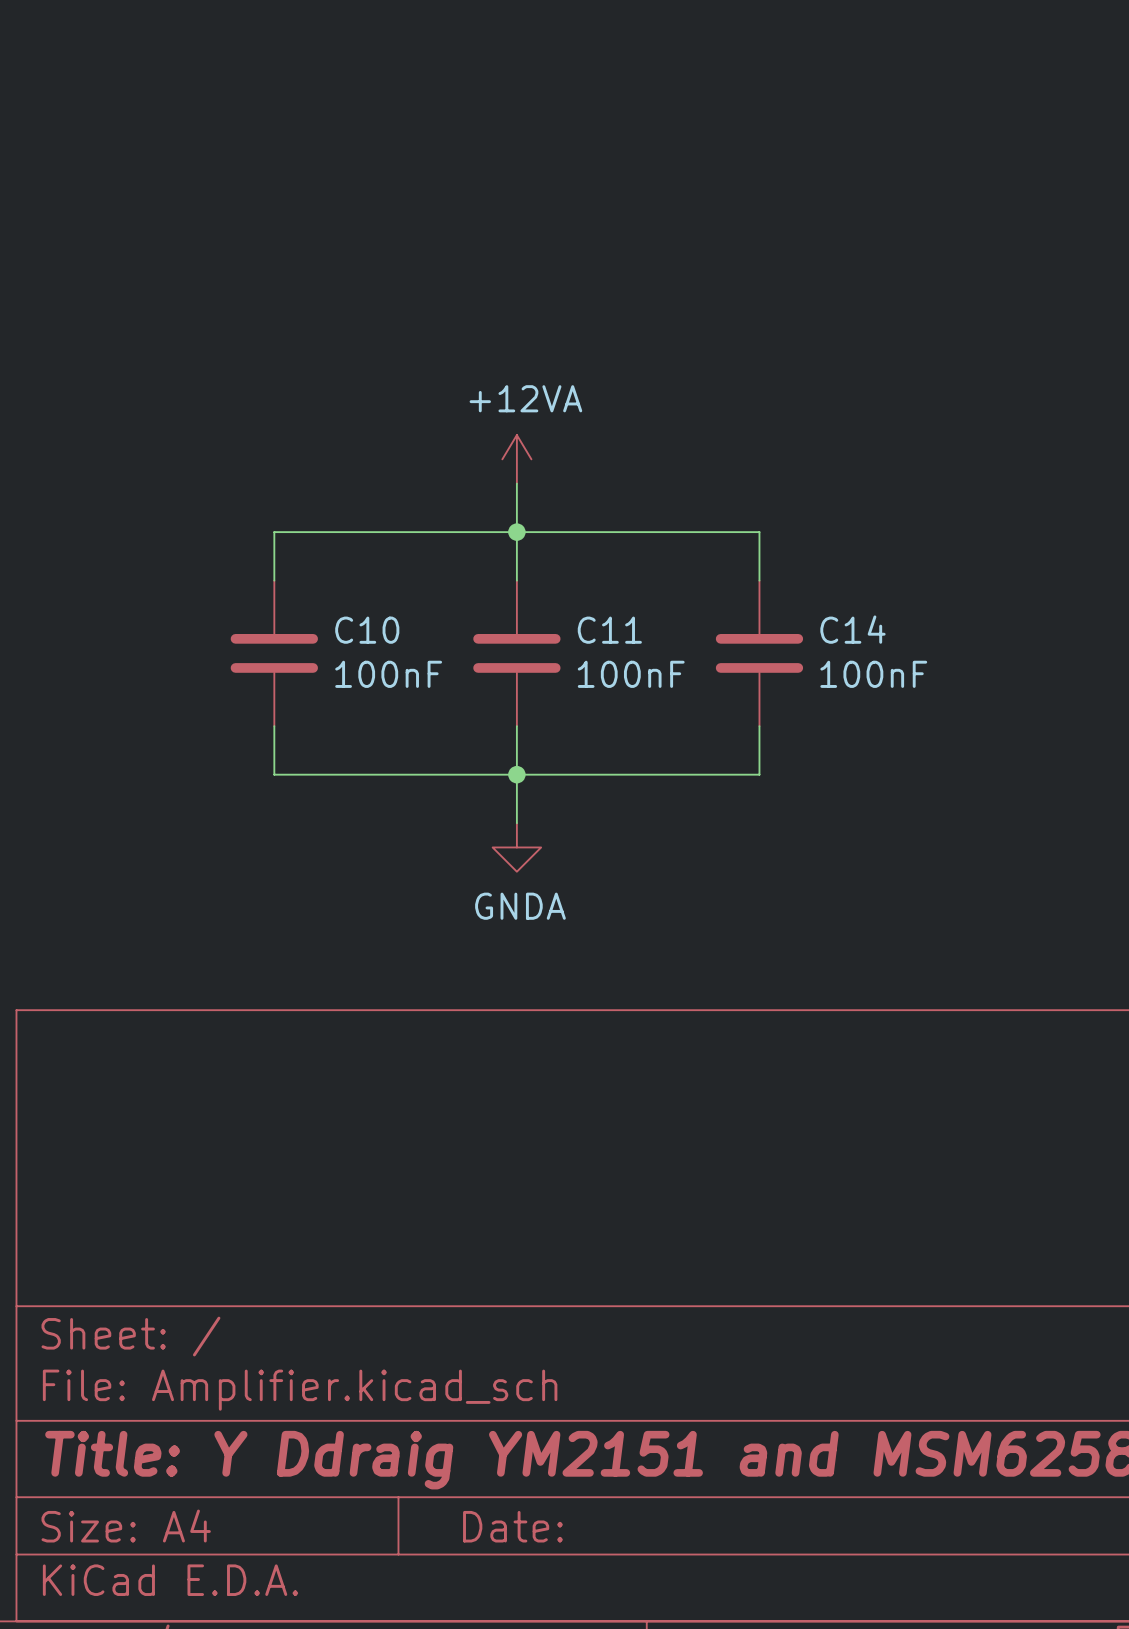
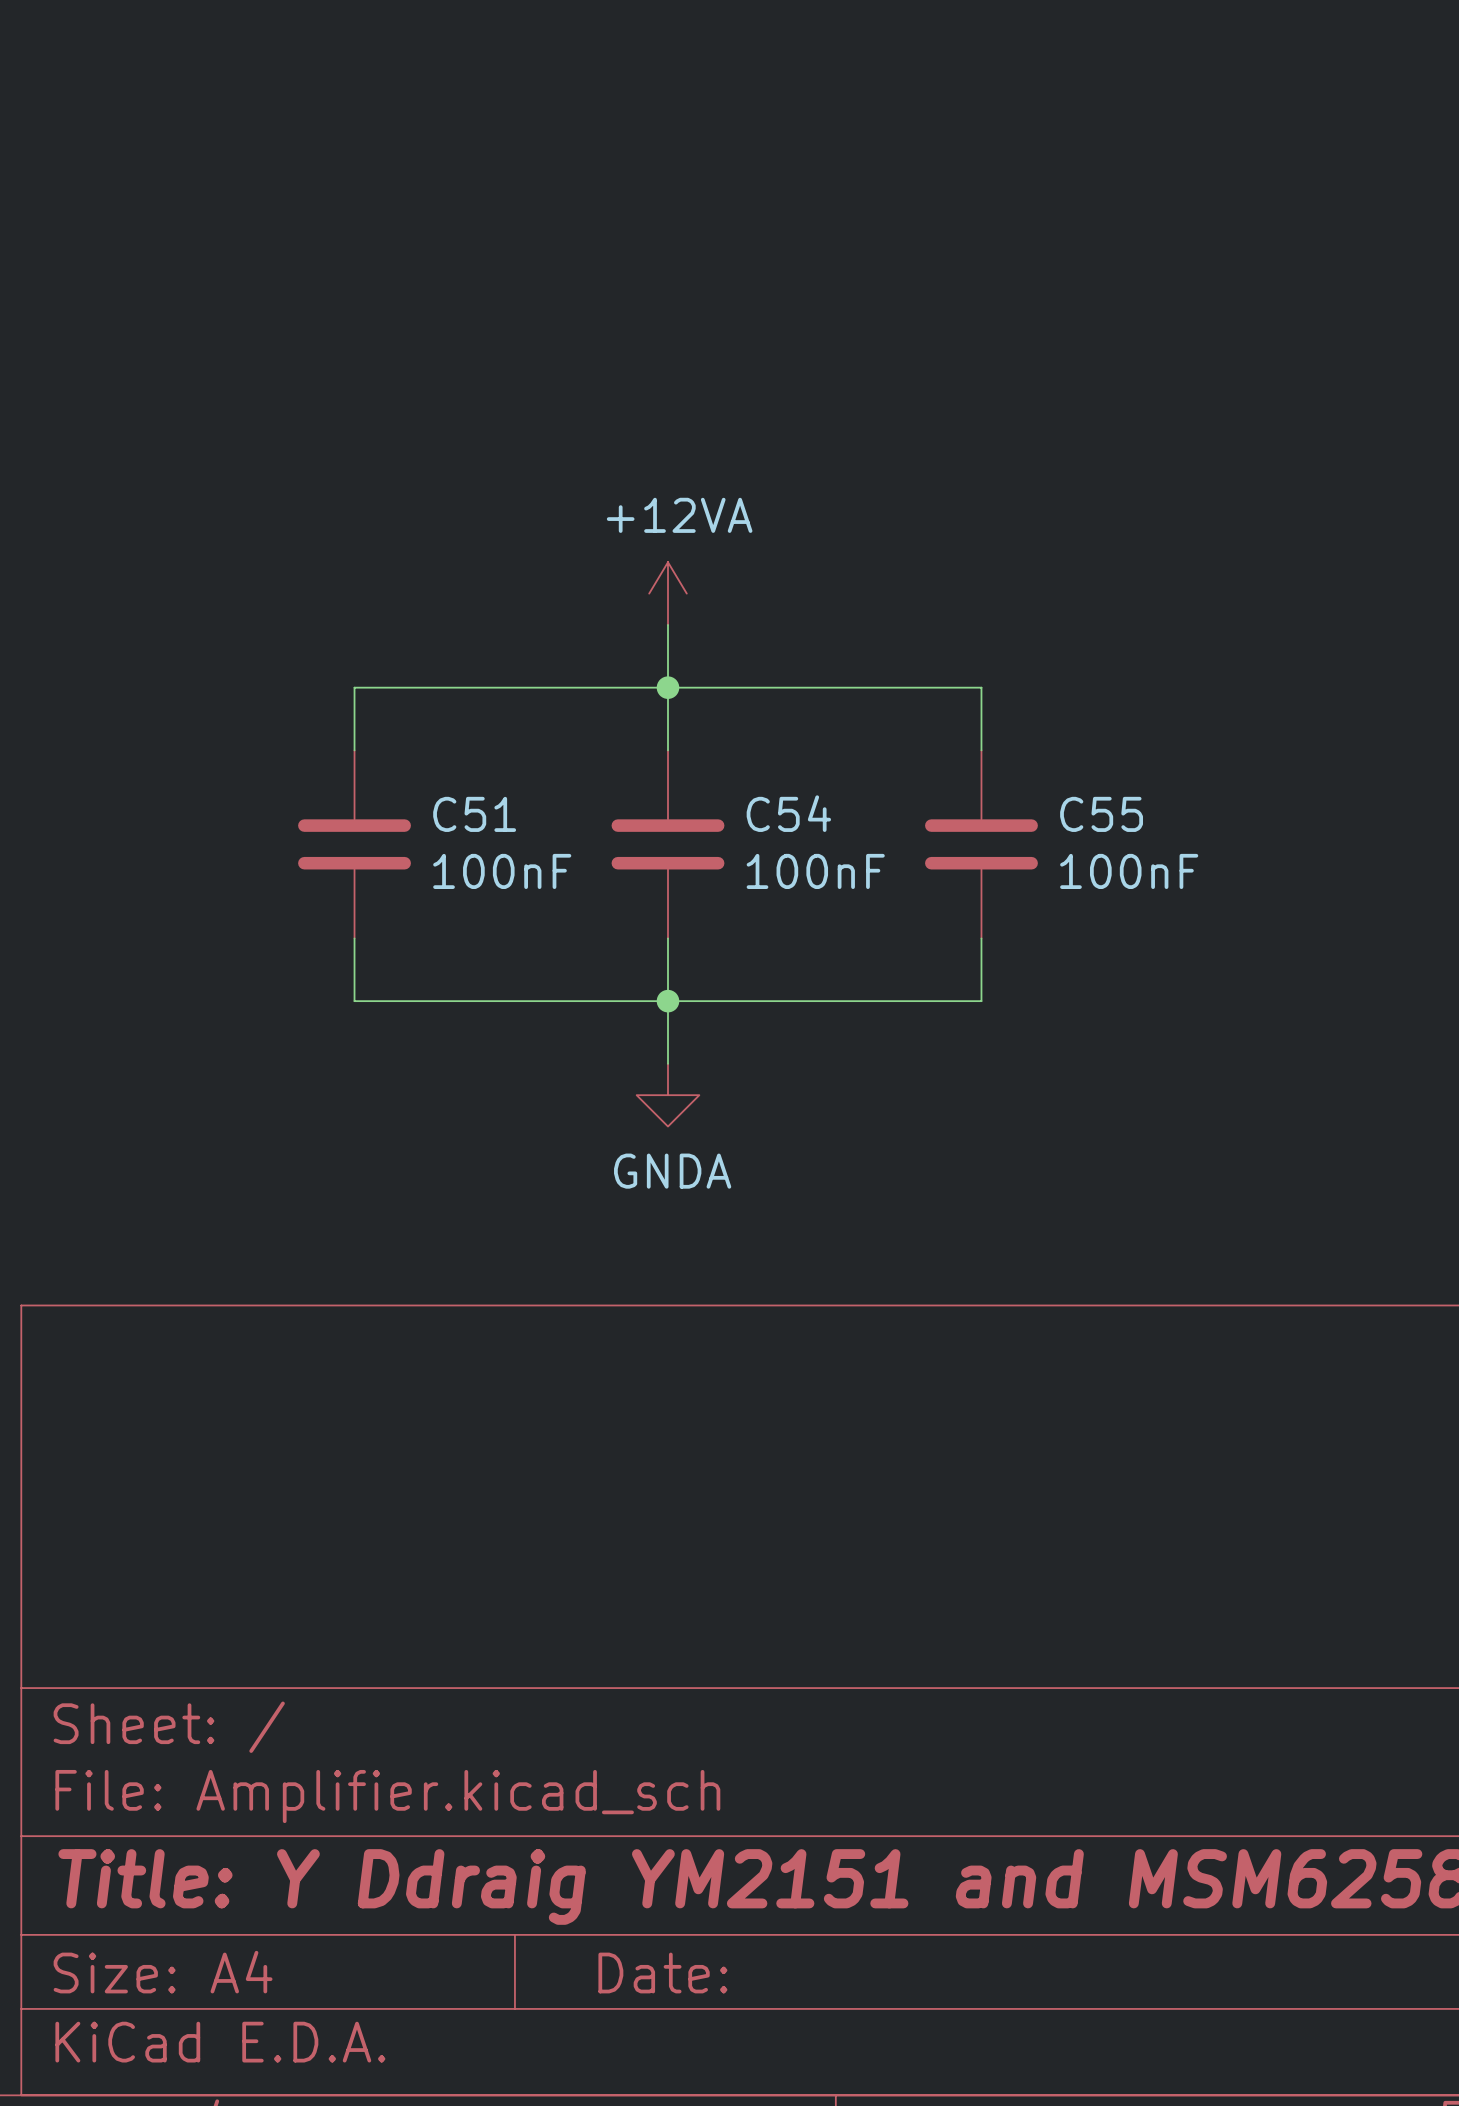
C14 name: C14 (852, 629) -> C55 (1101, 814)
C10 name: C10 (367, 630) -> C51 (474, 814)
C11 name: C11 (609, 630) -> C54 (788, 813)

